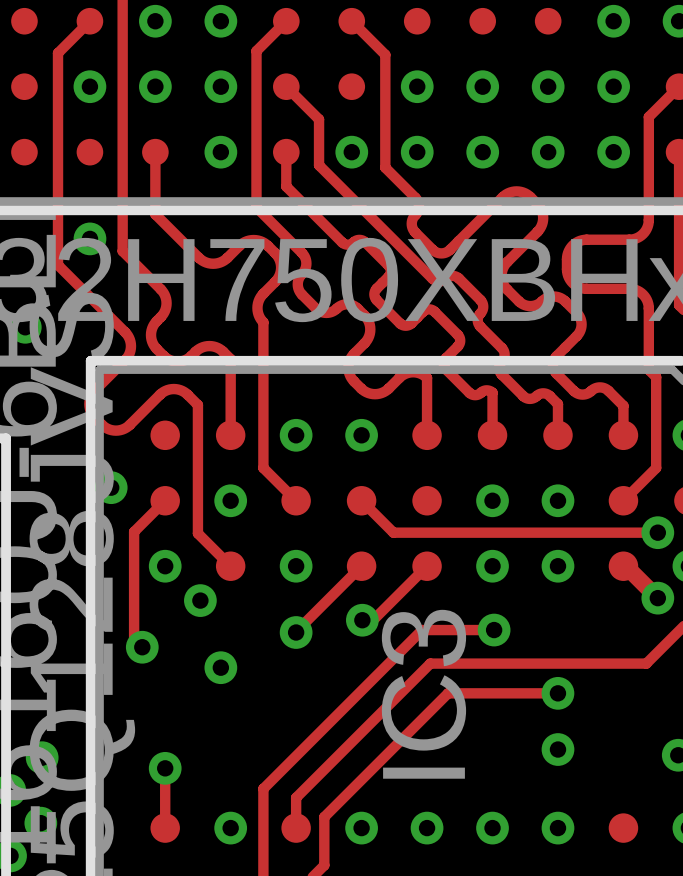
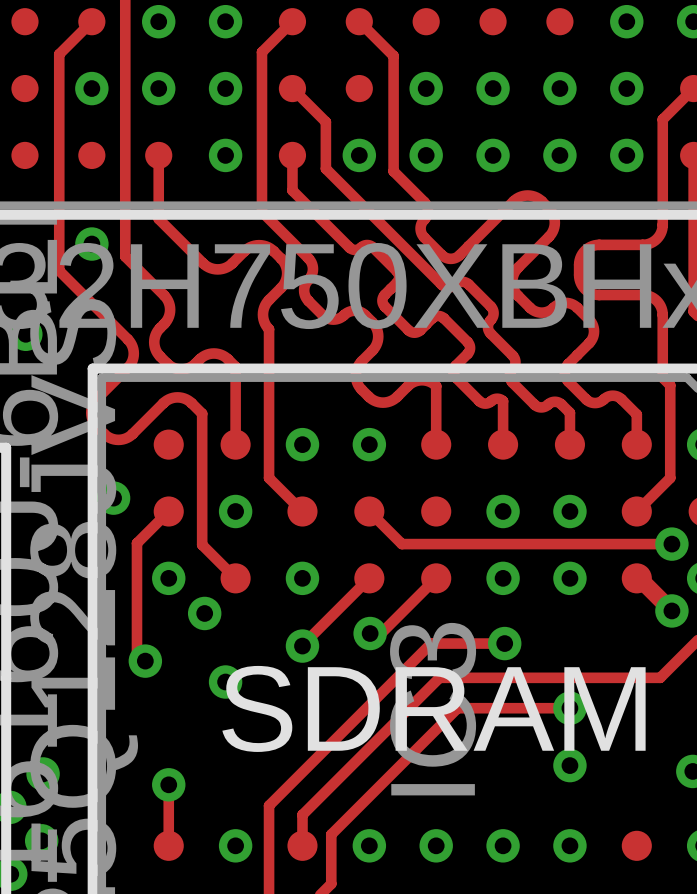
text: none -> SDRAM (433, 708)

